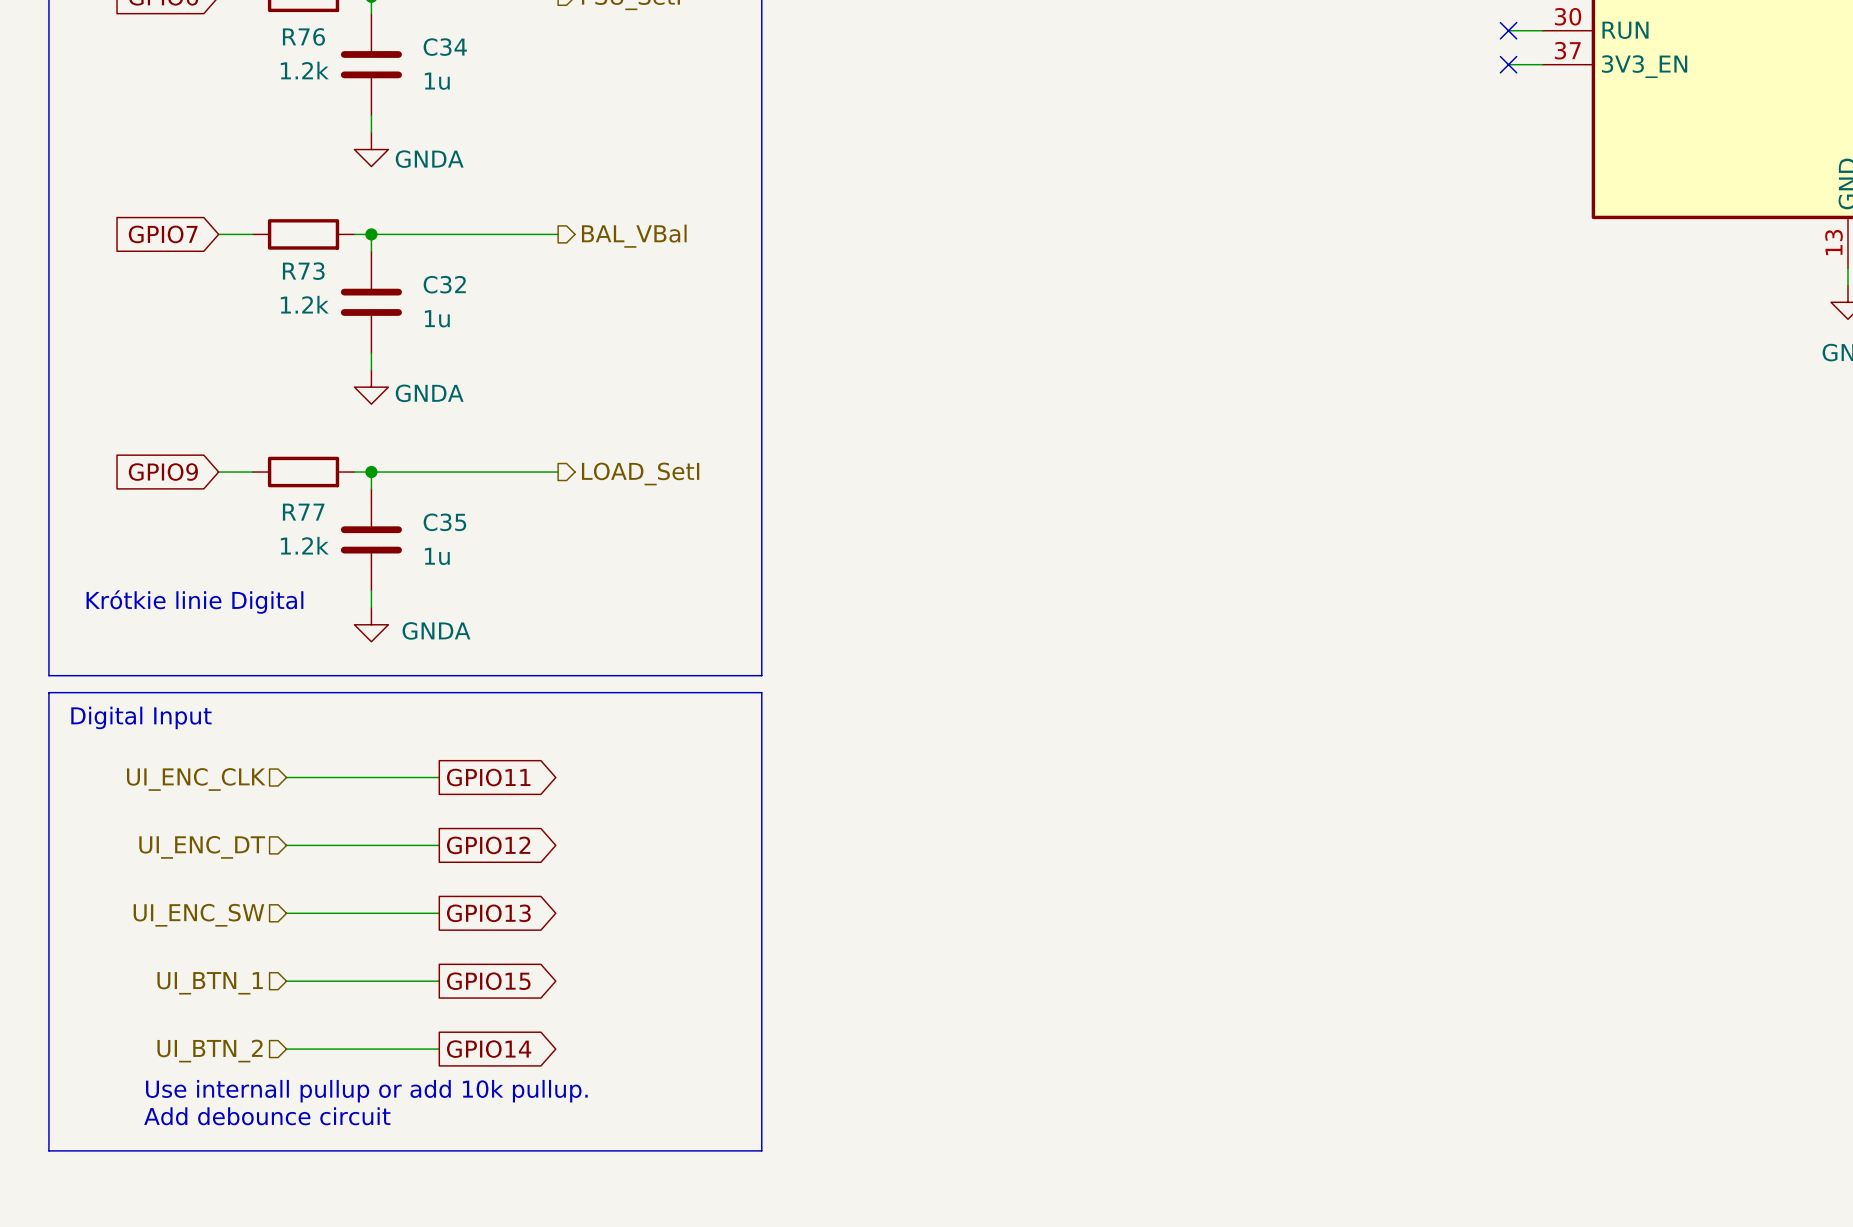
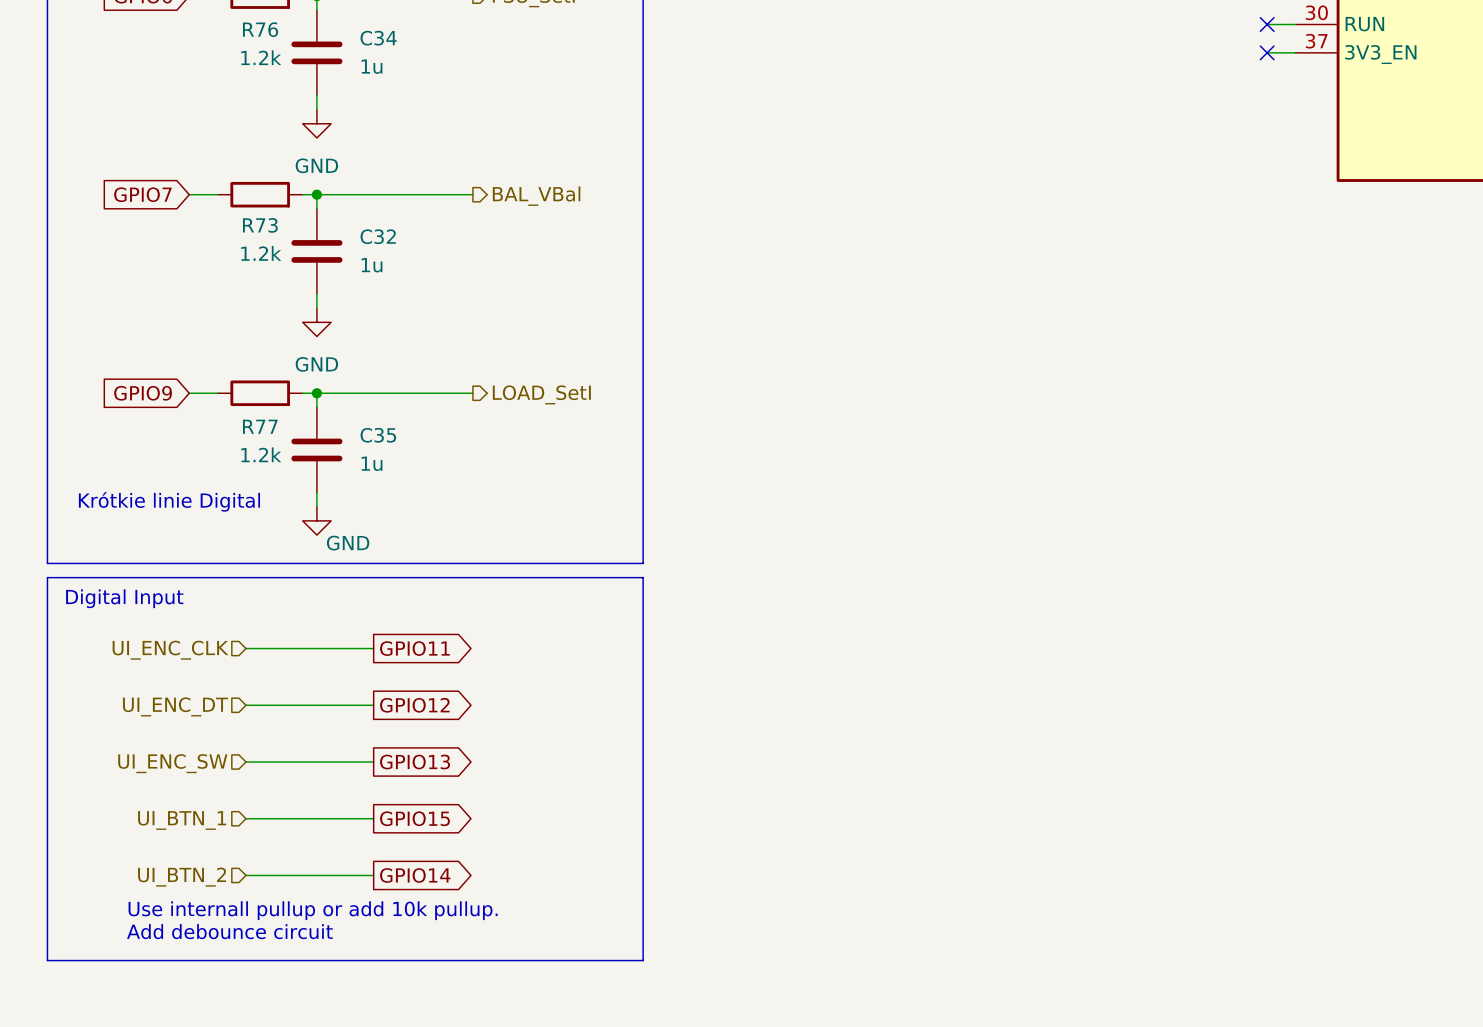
power symbol: GNDA (371, 149) -> GND (316, 123)
power symbol: GNDA (371, 387) -> GND (316, 322)
power symbol: GNDA (371, 624) -> GND (316, 520)

